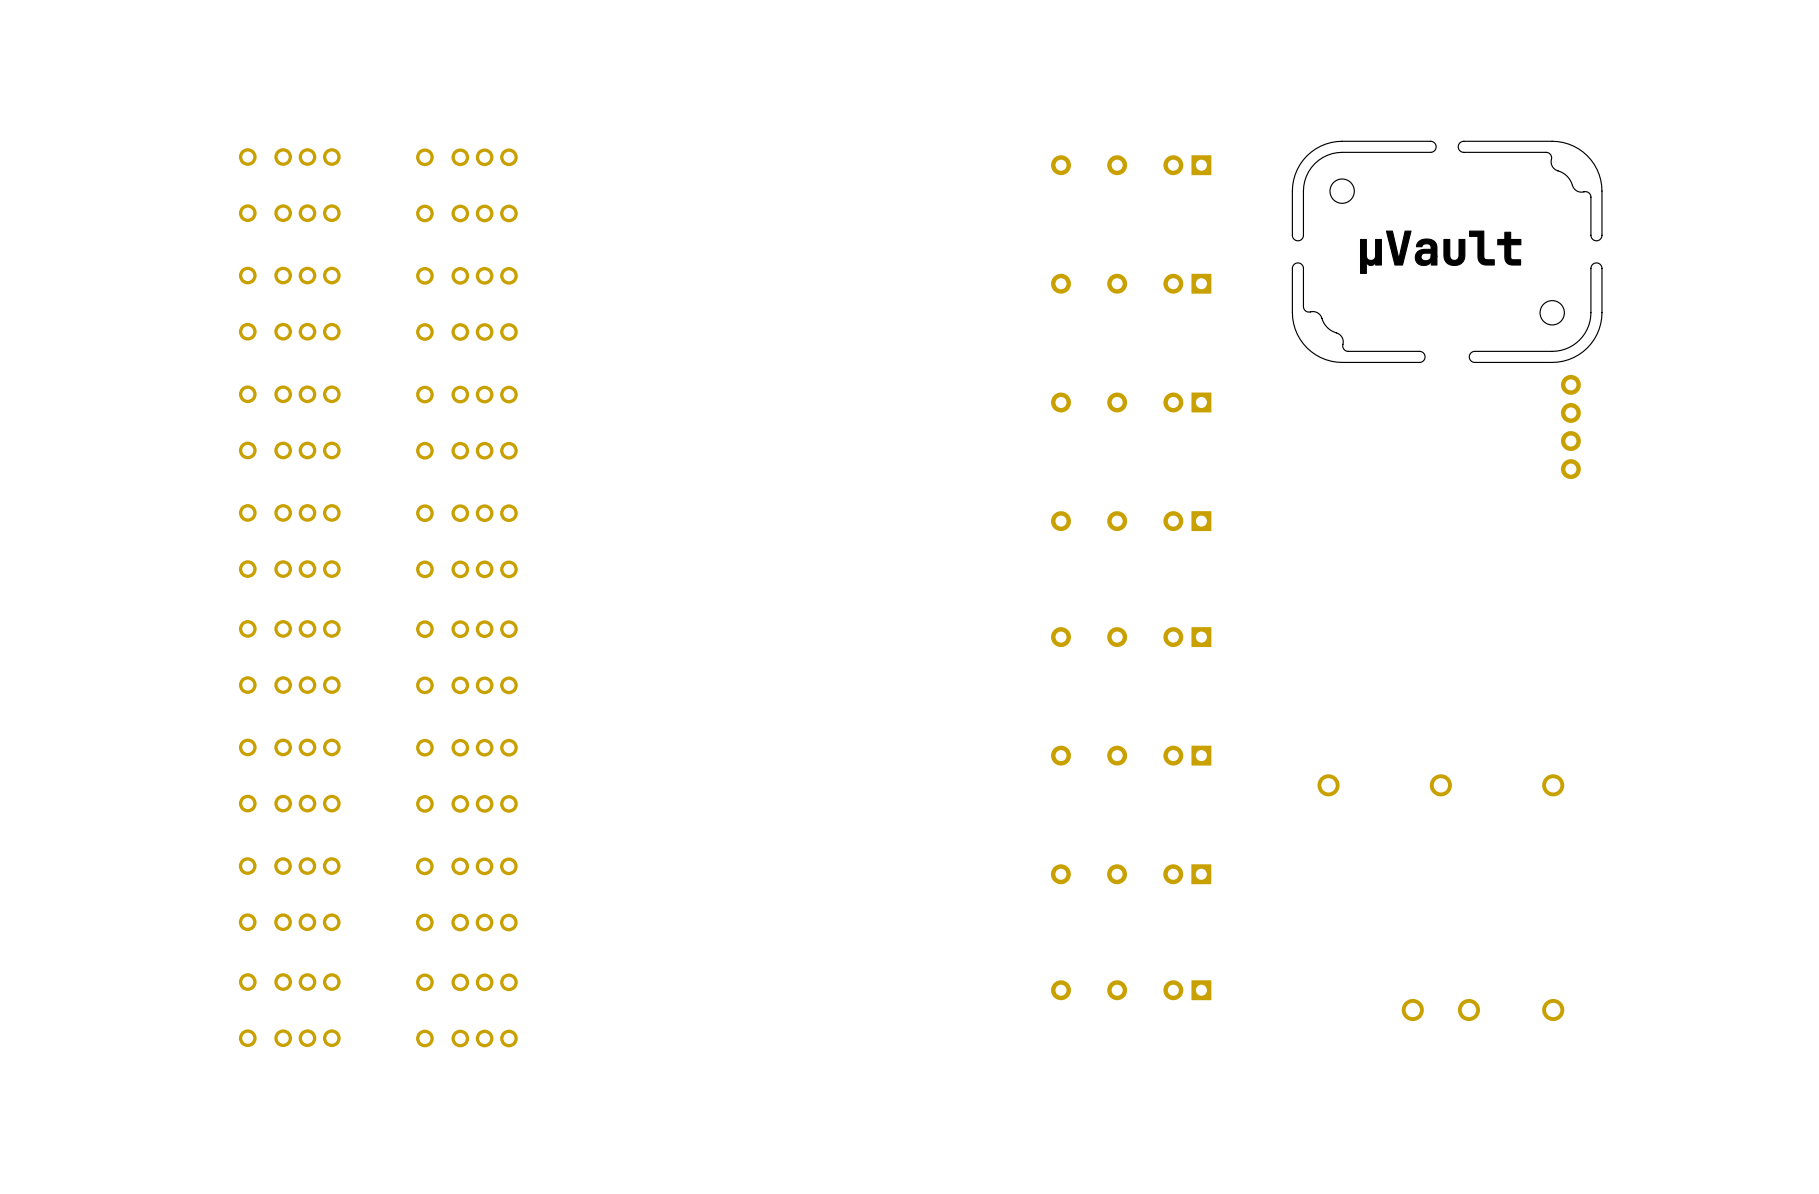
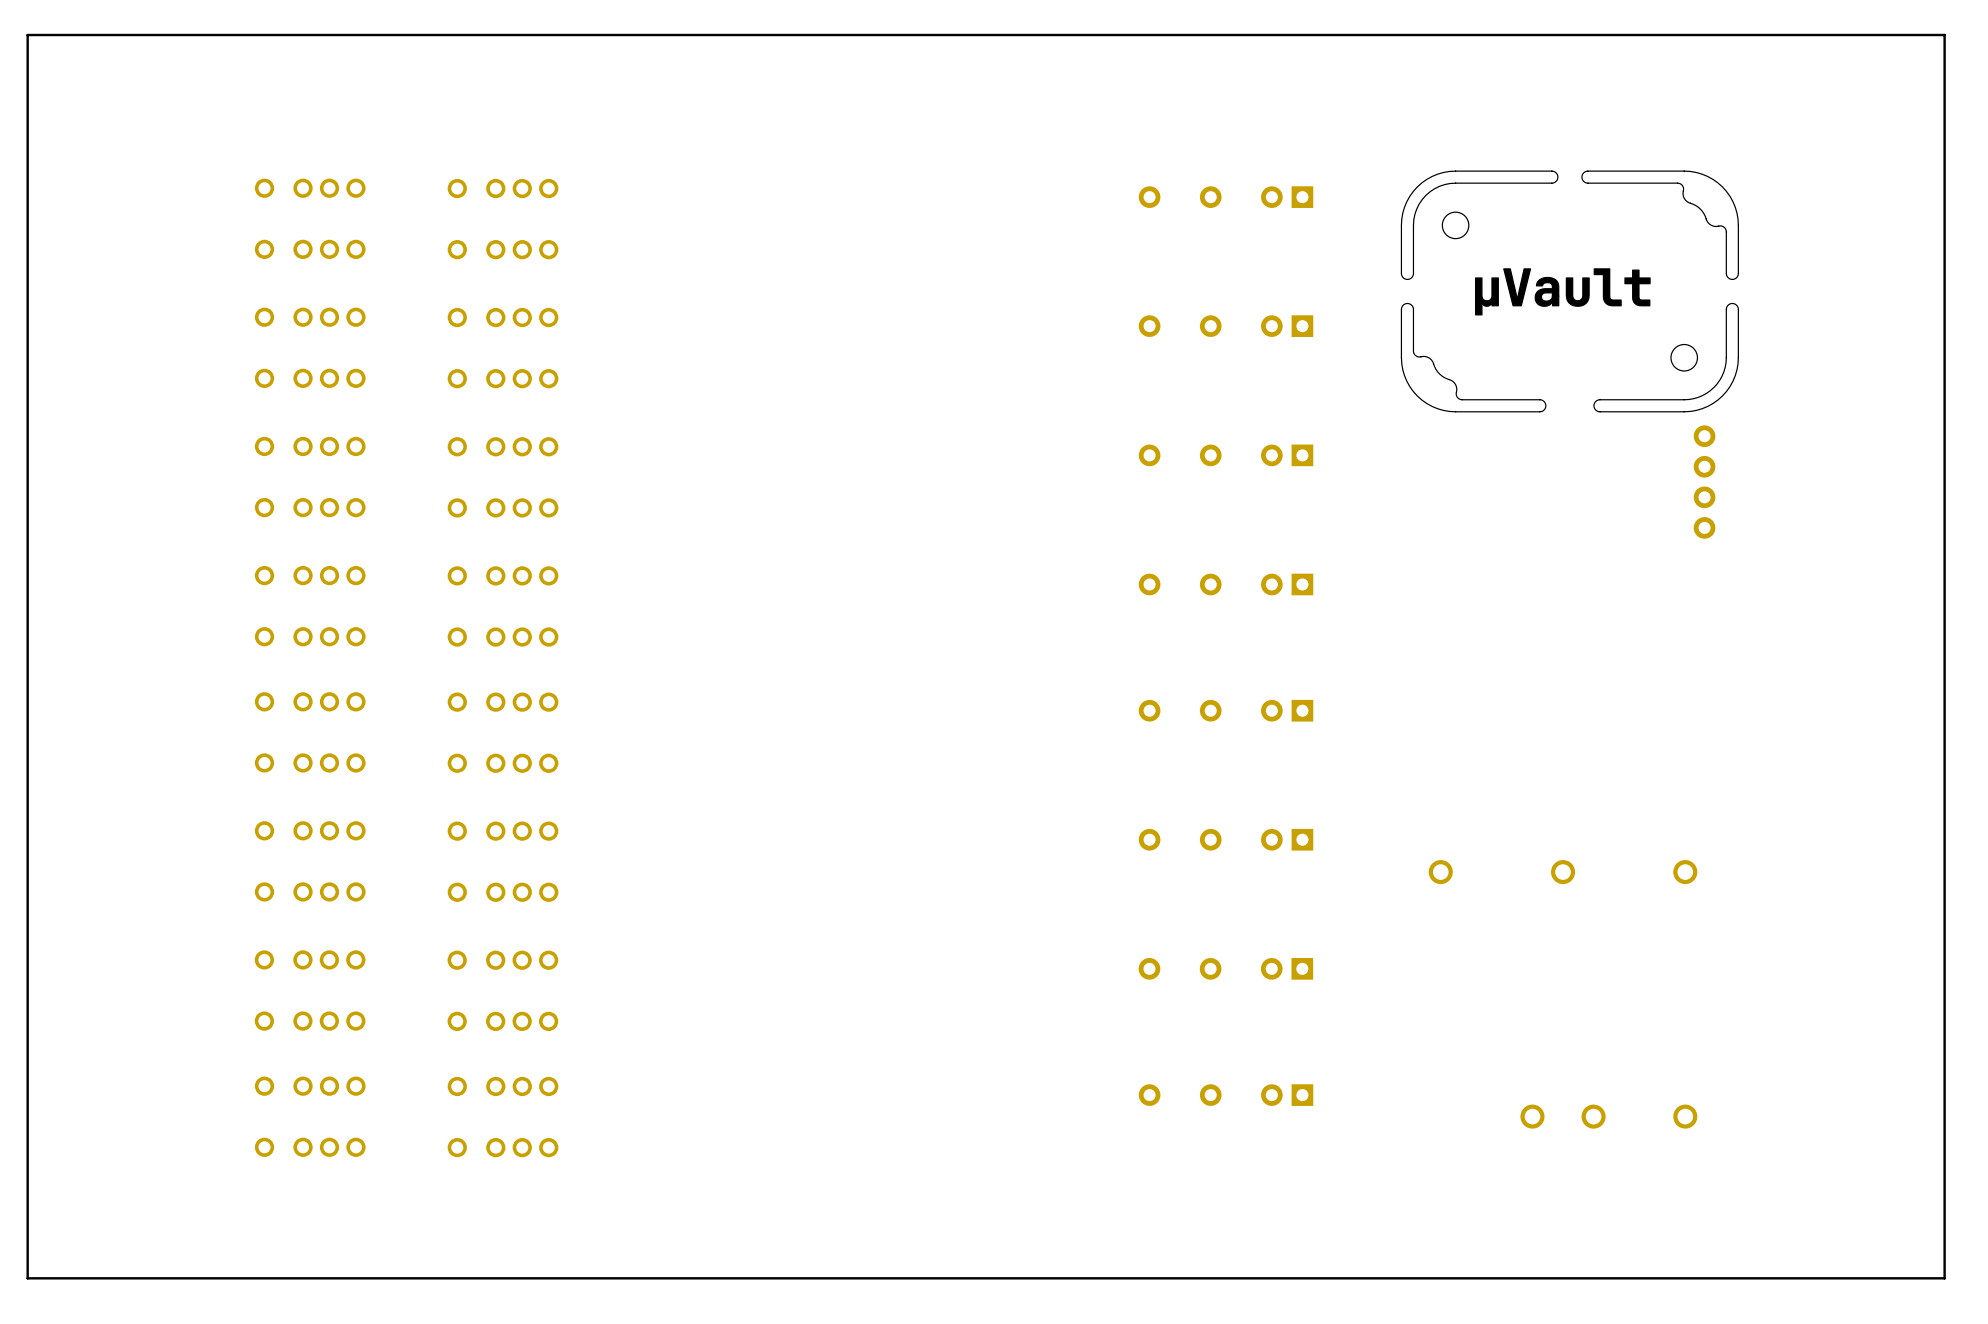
board edge: none -> (1944, 35) (27, 35) (27, 1278) (1944, 1278) (1944, 35)

